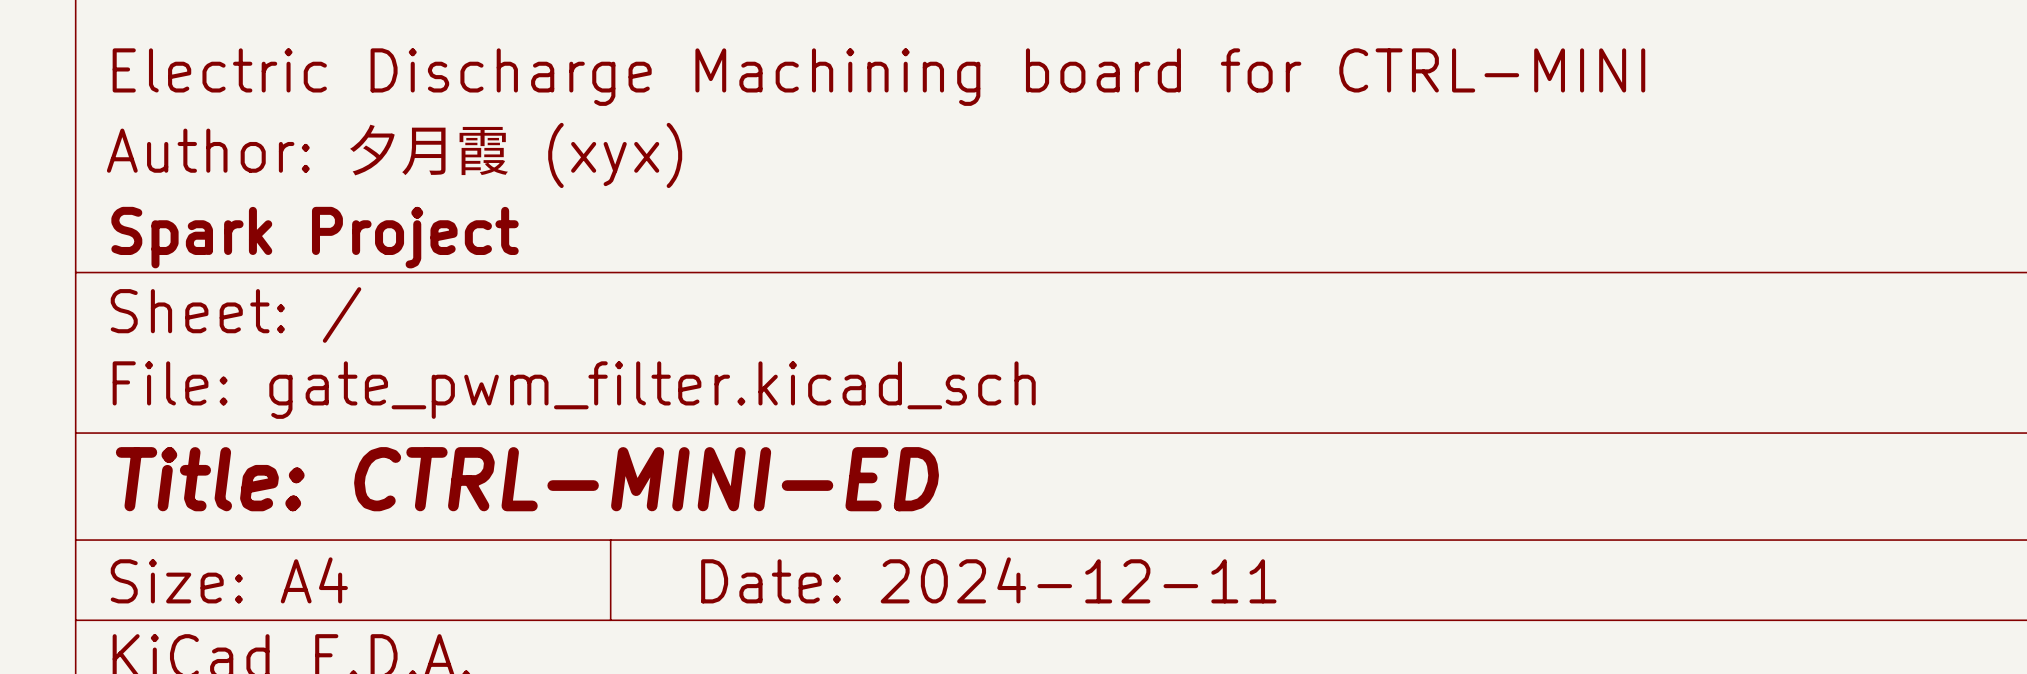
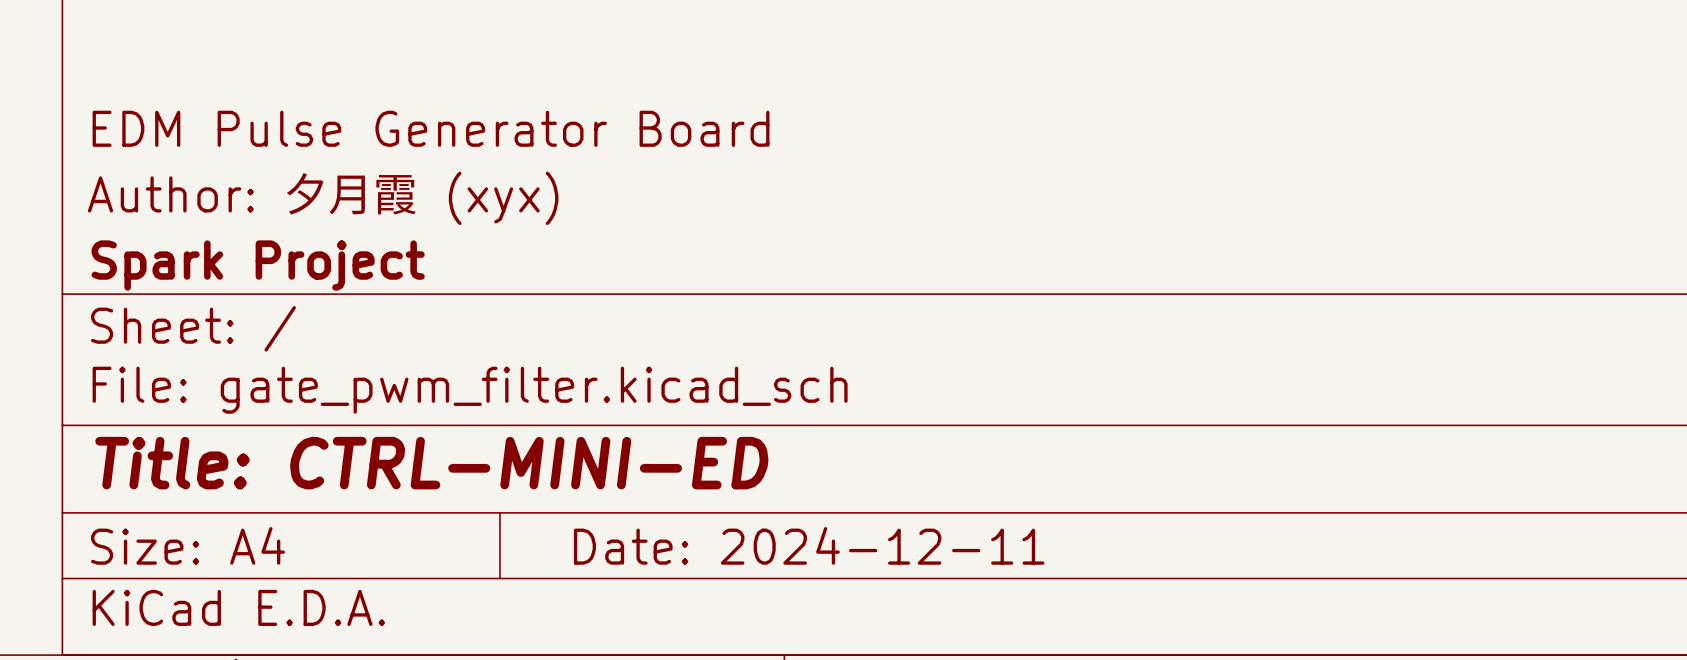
title block: Electric Discharge Machining board for CTRL-MINI (878, 77) -> EDM Pulse Generator Board (431, 128)

